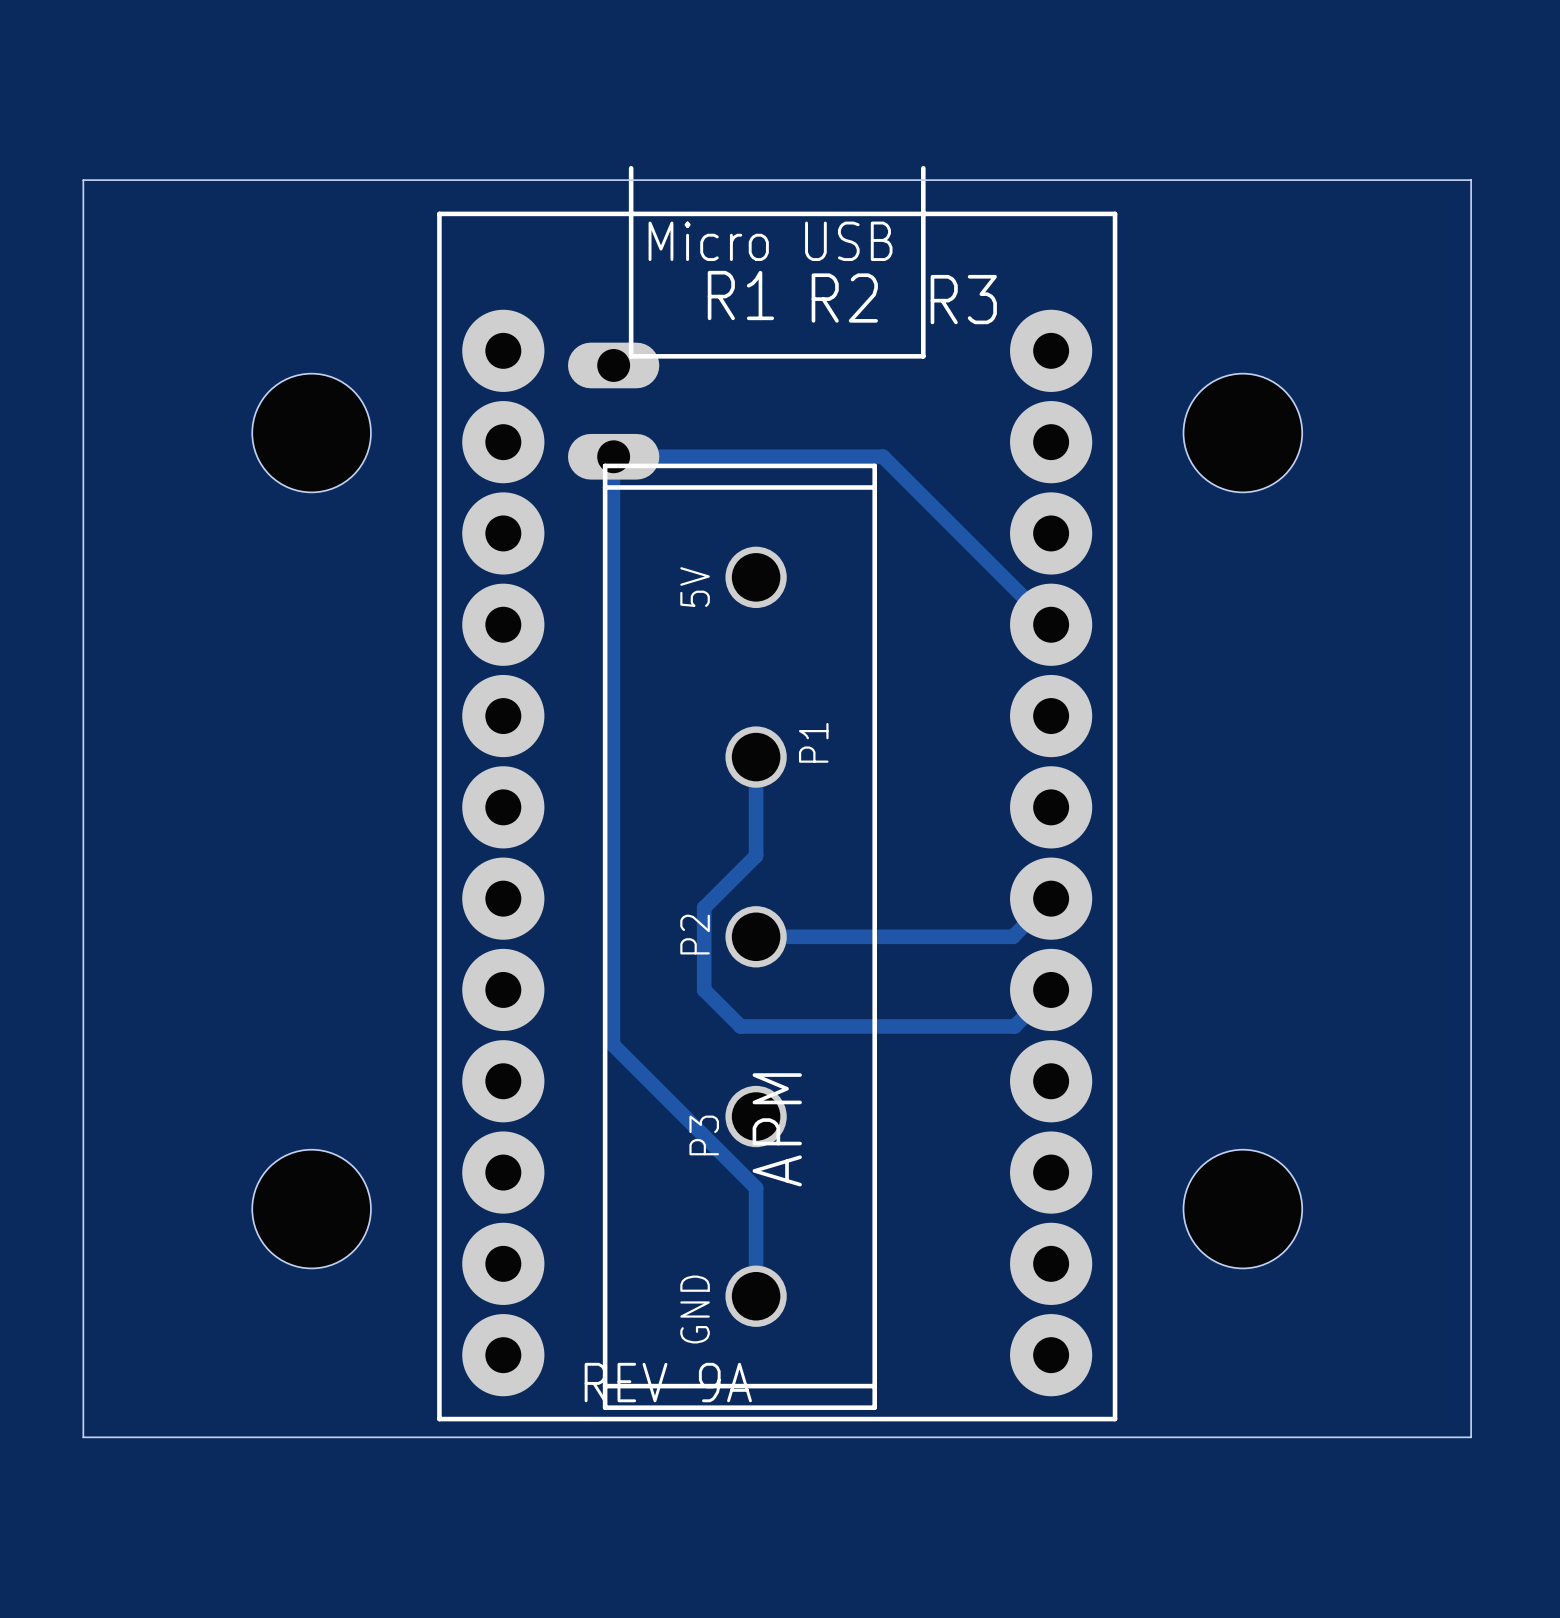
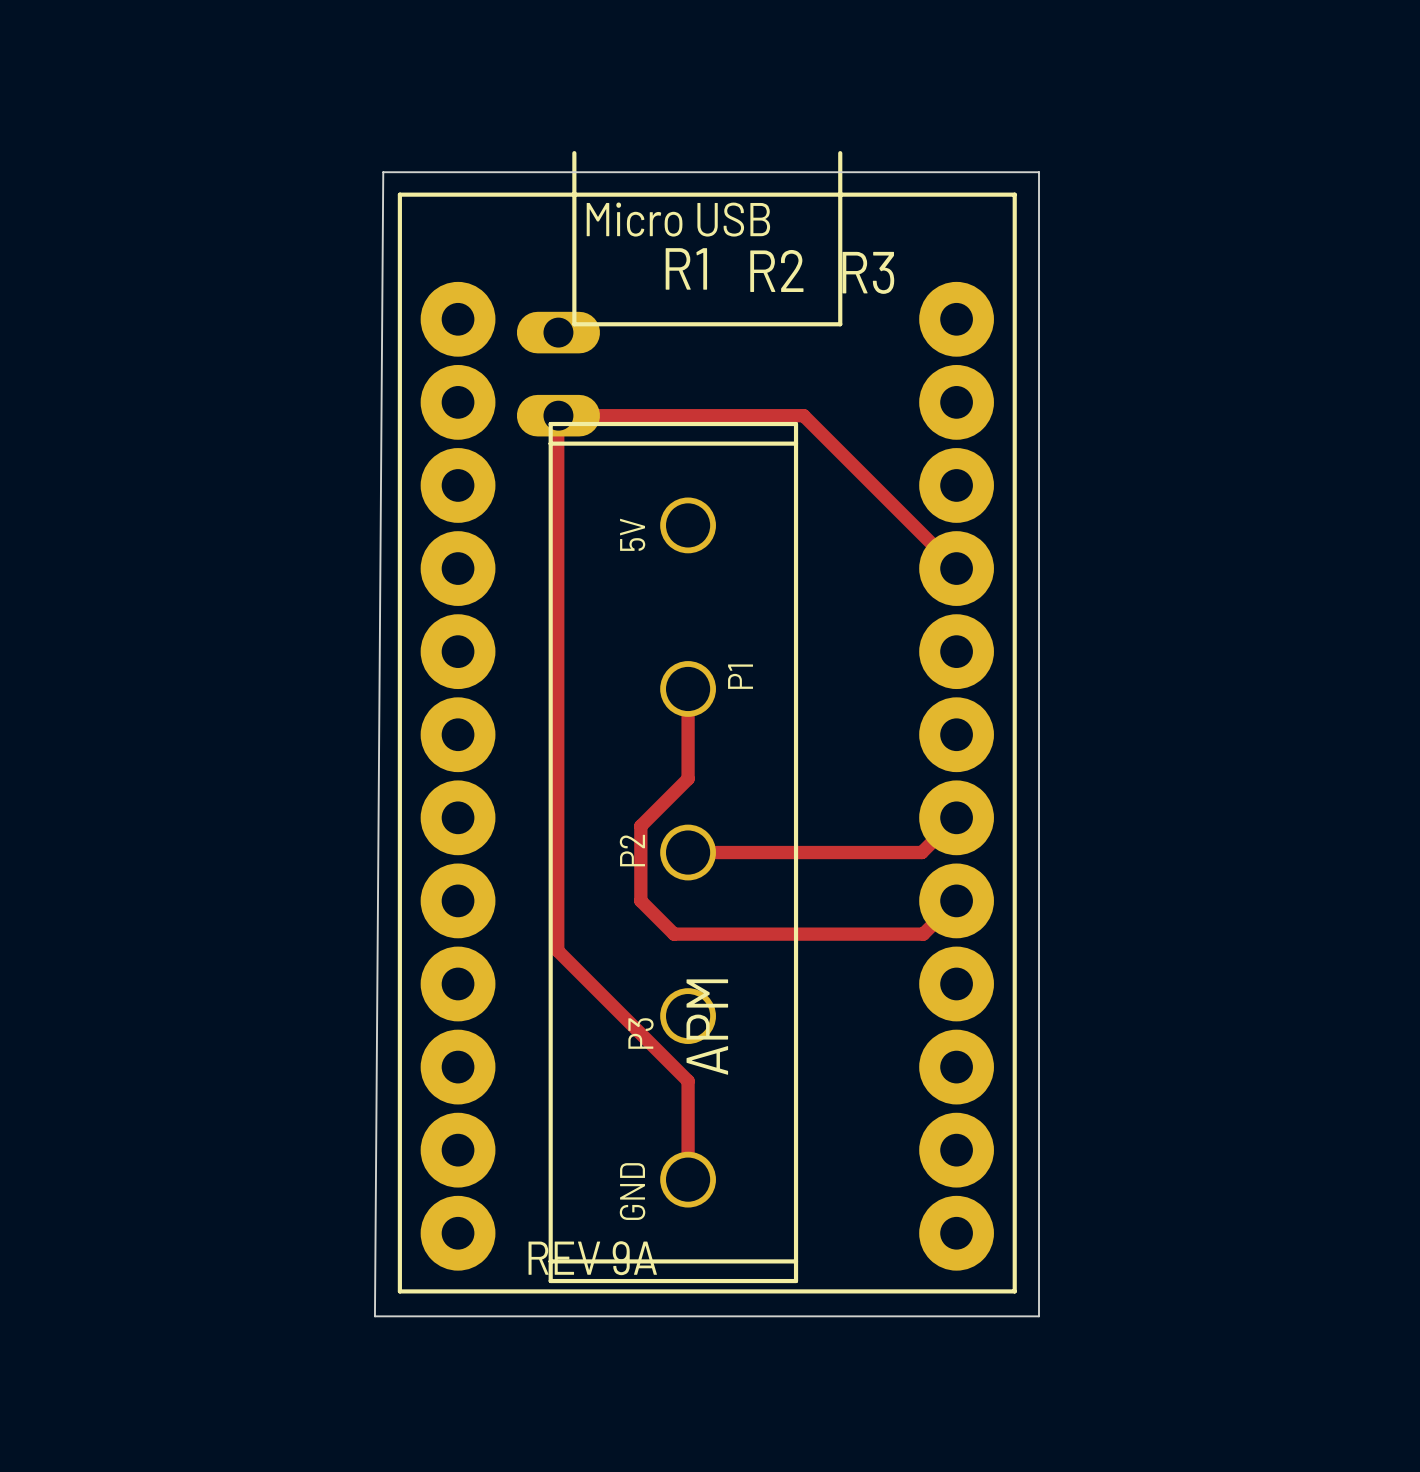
board edge: (83, 180) (1471, 180) (1471, 1437) (83, 1437) (83, 180) -> (383, 172) (374, 1316) (1039, 1316) (1039, 172) (383, 172)
part: (311, 433) -> none
part: (1242, 433) -> none
part: (311, 1209) -> none
part: (1242, 1209) -> none

